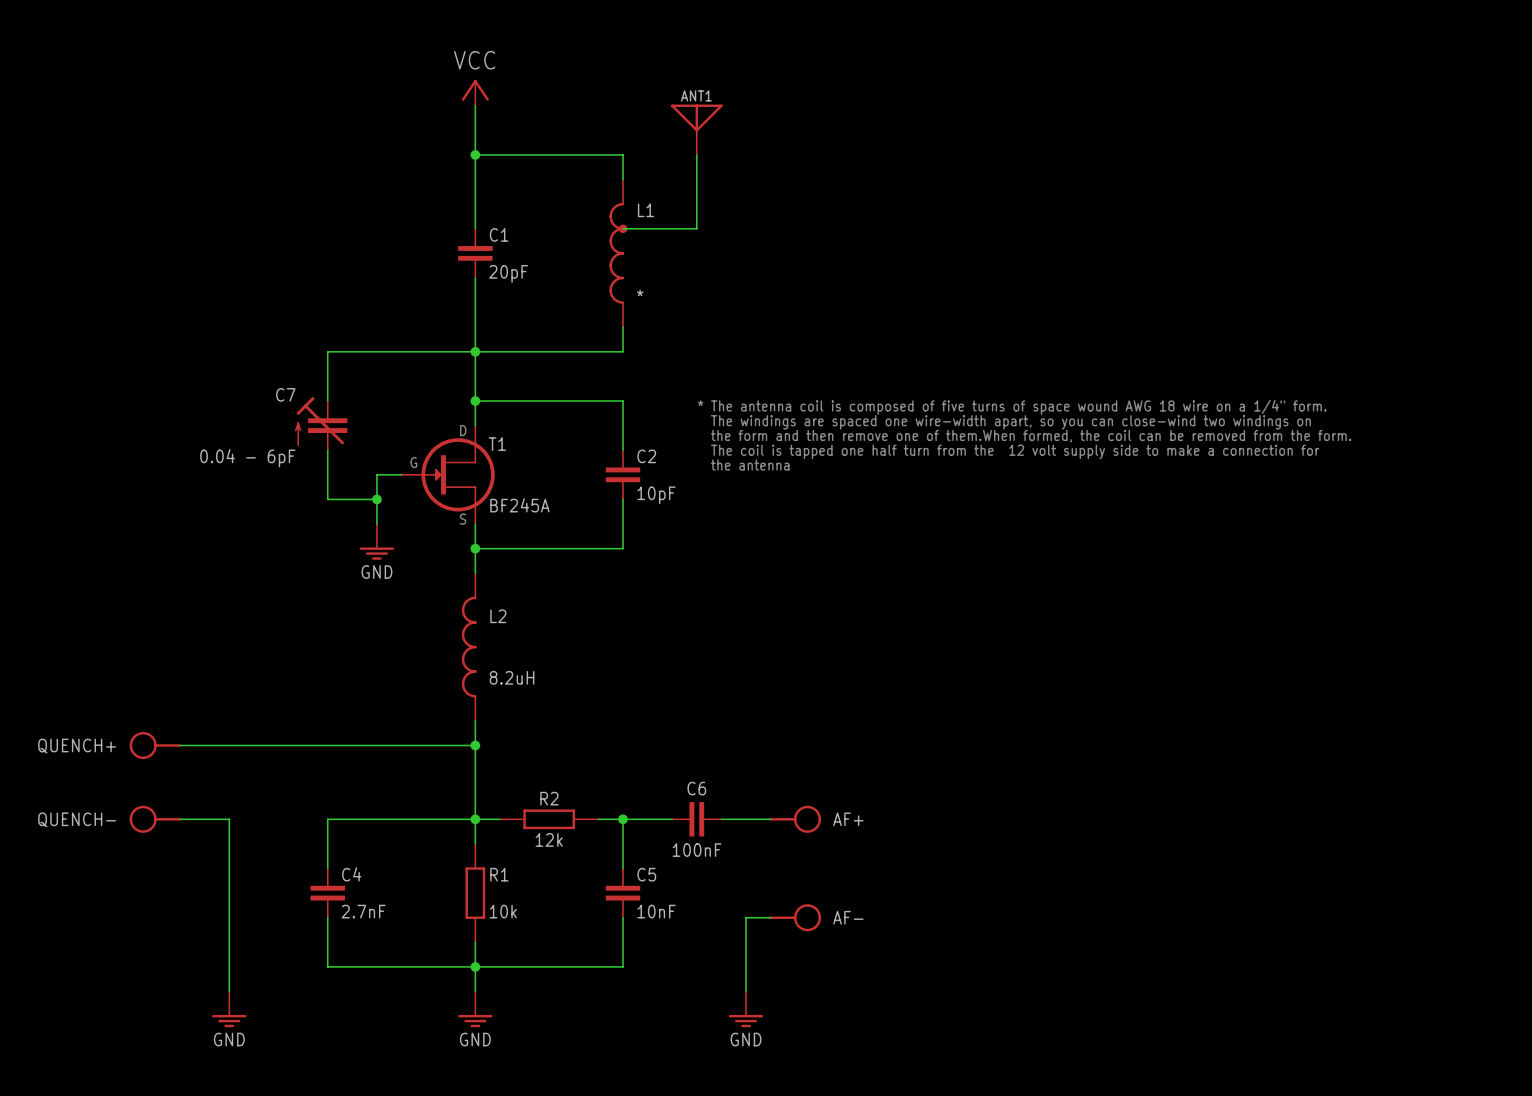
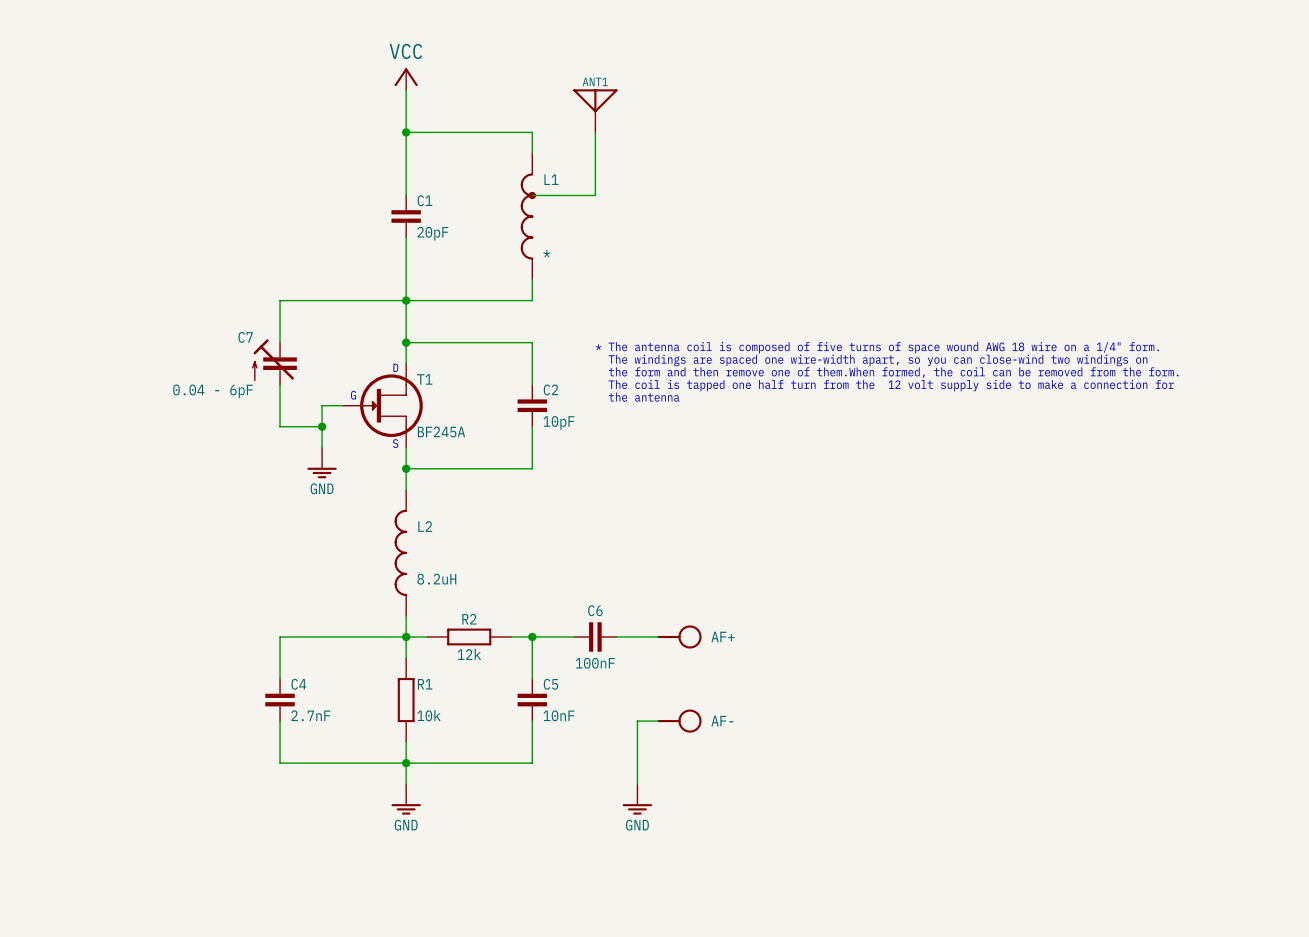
QUENCH+: (155, 745) -> none
wire: (180, 745) (327, 745) -> (280, 679) (280, 636)
wire: none -> (406, 636) (427, 636)
wire: none -> (532, 636) (532, 679)
junction: none -> (532, 636)
wire: (475, 770) (475, 843) -> none
QUENCH-: (155, 819) -> none
wire: (180, 819) (229, 819) (229, 991) -> none
junction: (475, 819) -> none
wire: (499, 819) (327, 819) (327, 843) -> none
R2 position: (549, 819) -> (469, 636)
wire: (598, 819) (672, 819) -> (511, 636) (574, 636)
junction: (622, 819) -> none
C6 position: (696, 819) -> (595, 636)
wire: (721, 819) (770, 819) -> (616, 636) (658, 636)
AF+ position: (795, 819) -> (679, 636)
wire: none -> (280, 742) (280, 763) (532, 763) (532, 742)
C4 position: (327, 893) -> (280, 700)
R1 position: (475, 893) -> (406, 700)
junction: none -> (406, 763)
C5 position: (622, 893) -> (532, 700)
wire: (327, 917) (327, 966) (622, 966) (622, 917) -> none
wire: (770, 917) (746, 917) (746, 991) -> (658, 721) (637, 721) (637, 784)
AF- position: (795, 917) -> (679, 721)
wire: (475, 942) (475, 991) -> (406, 742) (406, 784)
junction: (475, 966) -> none
power symbol: GND (229, 1009) -> none
part position: (475, 1009) -> (406, 799)
power symbol position: GND (746, 1009) -> GND (637, 799)

